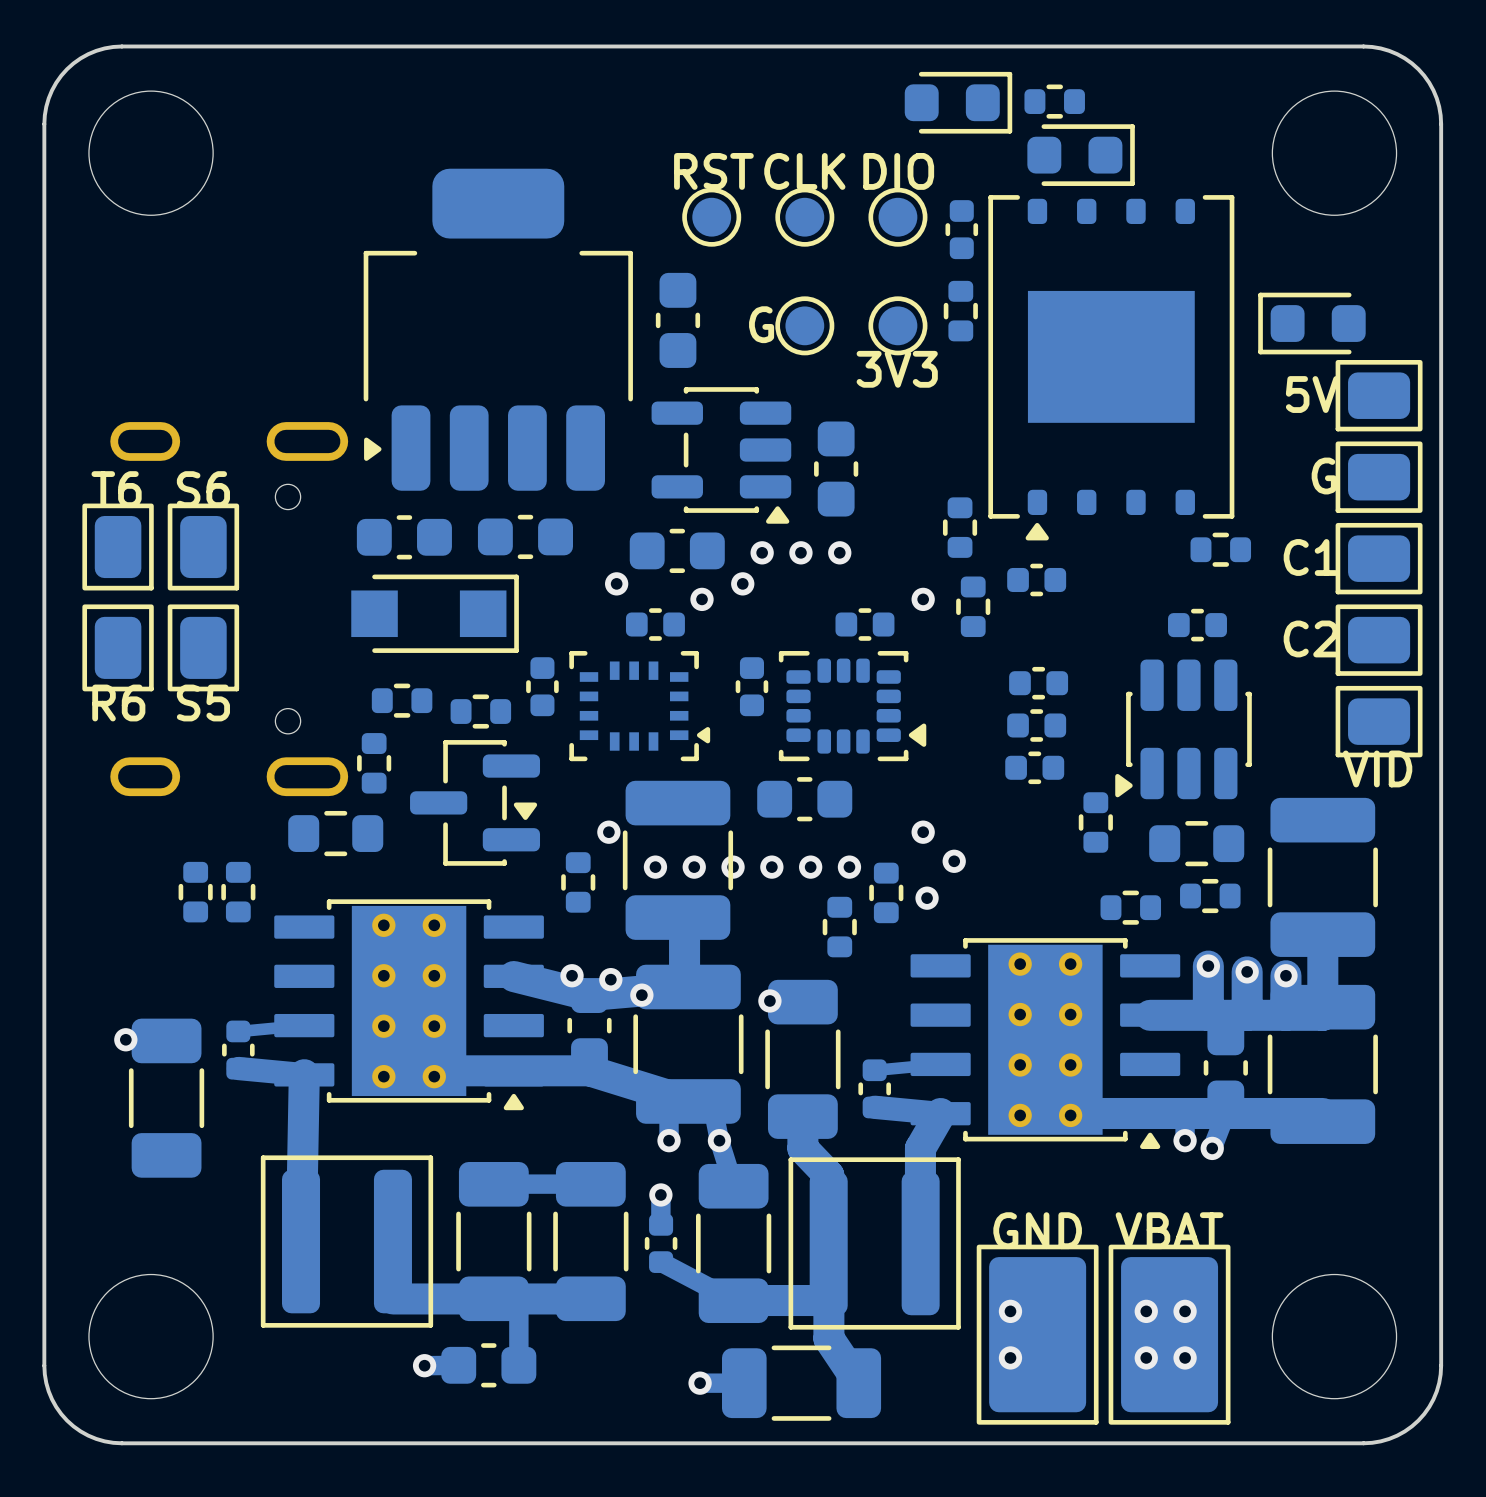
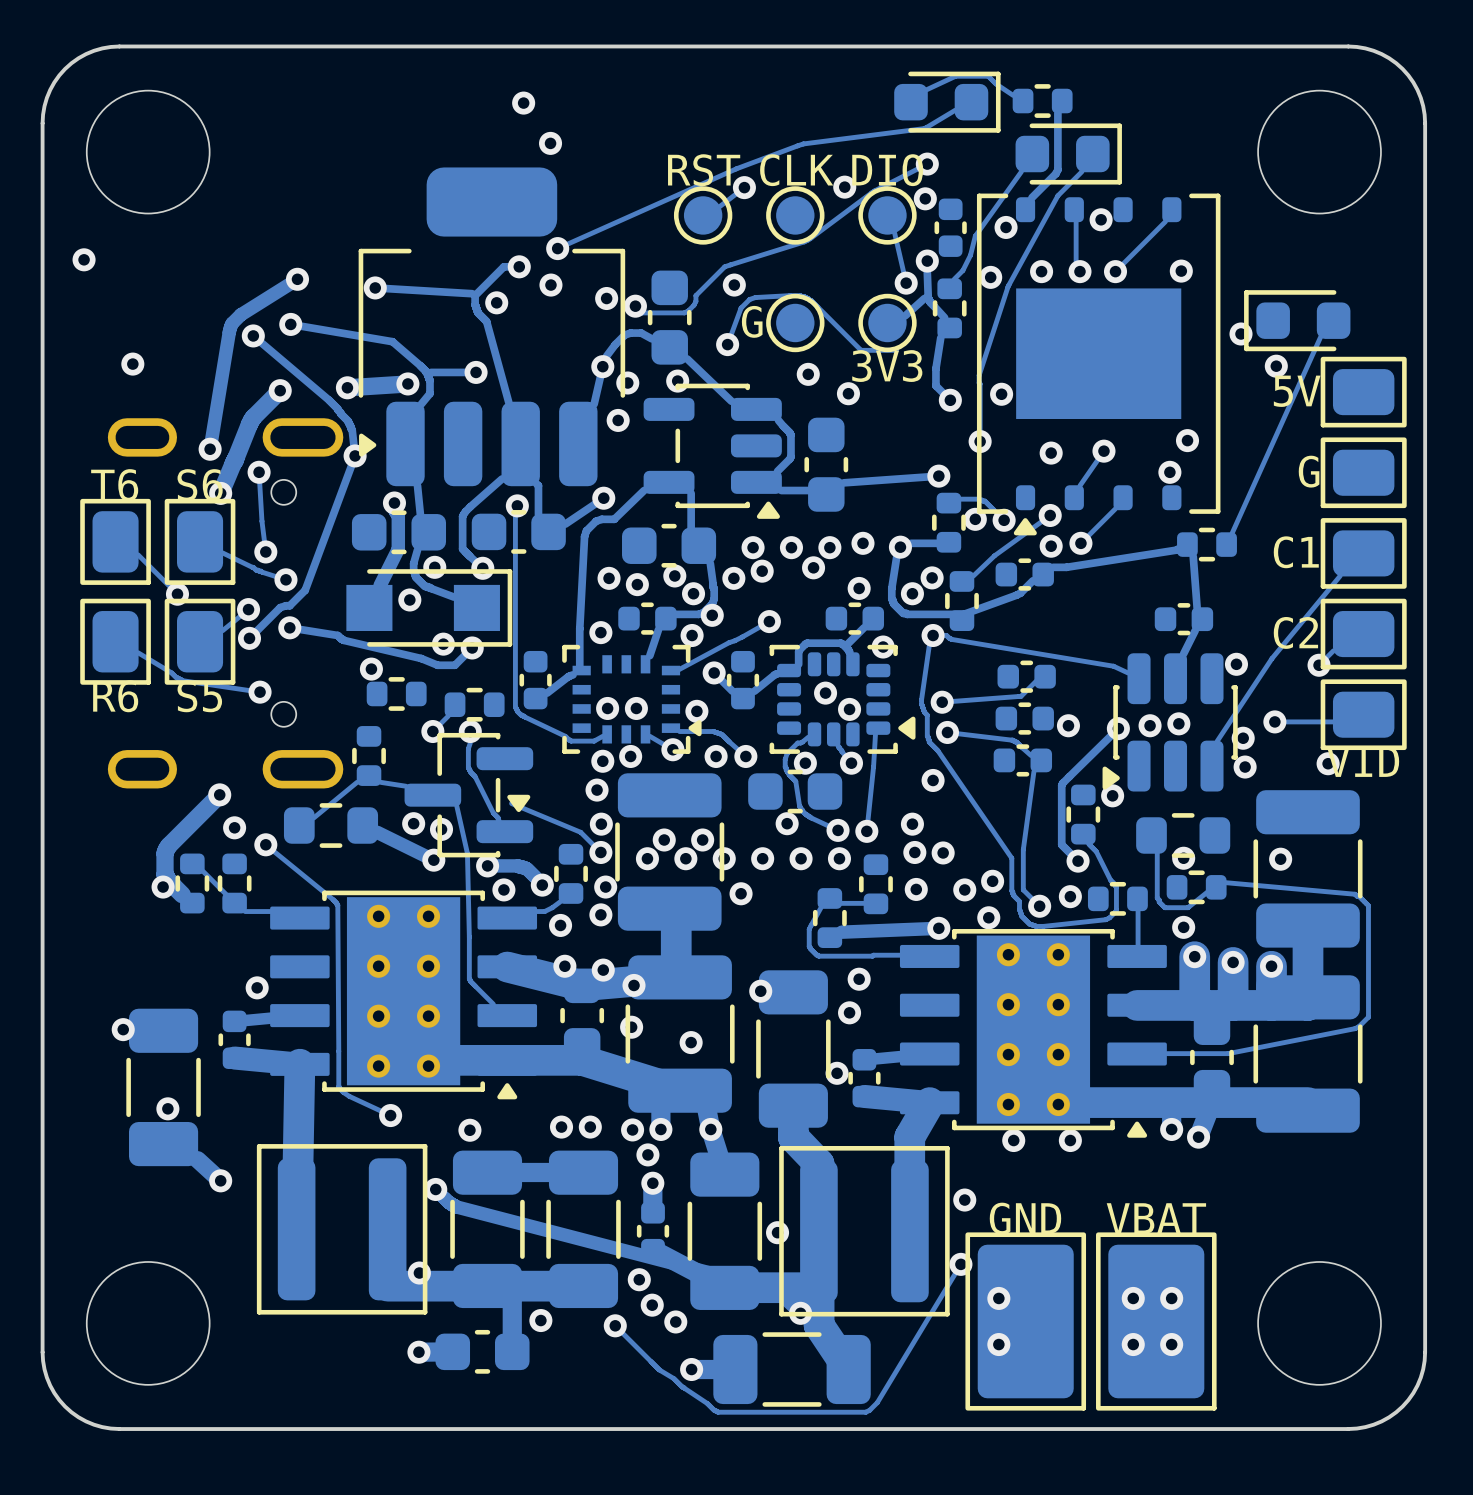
track: none -> (926, 89) (955, 76) (988, 76) (1013, 95)
via: none -> (523, 103)
track: none -> (955, 110) (924, 128) (797, 145) (736, 168) (557, 248)
track: none -> (1057, 113) (1057, 169) (1031, 197)
via: none -> (550, 143)
track: none -> (927, 164) (874, 190) (808, 239) (724, 266) (695, 295) (694, 305) (684, 312) (642, 312) (635, 306)
via: none -> (927, 164)
track: none -> (1021, 171) (975, 236) (970, 255) (962, 270) (954, 279)
track: none -> (1081, 171) (1057, 195) (1007, 286) (979, 375) (980, 441)
via: none -> (844, 187)
track: none -> (744, 187) (719, 206)
via: none -> (744, 187)
via: none -> (925, 198)
via: none -> (1101, 219)
track: none -> (1076, 221) (1076, 267) (1079, 271)
track: none -> (1165, 221) (1115, 271)
via: none -> (1006, 227)
track: none -> (894, 233) (906, 283)
via: none -> (557, 248)
via: none -> (84, 259)
via: none -> (927, 261)
track: none -> (519, 266) (503, 266) (475, 295) (477, 310) (486, 321) (508, 402)
via: none -> (519, 266)
via: none -> (1041, 271)
via: none -> (1079, 271)
via: none -> (1115, 271)
via: none -> (1181, 271)
track: none -> (927, 272) (928, 298) (944, 317)
via: none -> (990, 277)
track: none -> (297, 279) (240, 314) (232, 323) (210, 449)
via: none -> (297, 279)
via: none -> (906, 283)
via: none -> (550, 285)
via: none -> (734, 285)
track: none -> (375, 287) (472, 293)
via: none -> (375, 287)
via: none -> (606, 298)
track: none -> (924, 298) (905, 315)
via: none -> (496, 302)
via: none -> (635, 306)
track: none -> (290, 324) (392, 341) (428, 374) (429, 393) (421, 404)
via: none -> (290, 324)
via: none -> (1241, 334)
track: none -> (253, 335) (337, 408) (351, 427) (355, 455)
via: none -> (253, 335)
track: none -> (940, 337) (935, 368) (935, 385) (950, 400)
track: none -> (1320, 337) (1232, 533)
track: none -> (651, 338) (641, 333) (624, 334) (606, 356)
track: none -> (727, 344) (741, 308) (749, 299) (800, 295) (811, 300) (861, 350) (896, 350)
via: none -> (727, 344)
track: none -> (687, 358) (731, 401)
via: none -> (132, 364)
track: none -> (602, 366) (594, 404)
via: none -> (602, 366)
via: none -> (1276, 366)
track: none -> (476, 372) (430, 372)
via: none -> (476, 372)
via: none -> (808, 374)
via: none -> (677, 381)
via: none -> (627, 382)
track: none -> (407, 383) (347, 387)
via: none -> (407, 383)
via: none -> (347, 387)
track: none -> (280, 390) (251, 420) (220, 493)
via: none -> (280, 390)
via: none -> (848, 393)
via: none -> (1001, 394)
via: none -> (950, 400)
via: none -> (618, 420)
track: none -> (778, 420) (790, 434) (790, 456) (777, 471)
via: none -> (1187, 440)
via: none -> (980, 441)
via: none -> (210, 449)
track: none -> (1103, 451) (1079, 485)
via: none -> (1103, 451)
via: none -> (1051, 453)
via: none -> (355, 455)
track: none -> (351, 466) (305, 590) (289, 605) (280, 607) (249, 638)
track: none -> (259, 472) (265, 551)
via: none -> (259, 472)
via: none -> (1169, 472)
track: none -> (938, 476) (843, 482)
via: none -> (938, 476)
track: none -> (501, 479) (470, 506) (462, 516) (462, 549) (482, 568)
track: none -> (536, 483) (538, 485) (538, 514)
track: none -> (417, 485) (420, 514)
track: none -> (644, 490) (614, 519) (596, 521) (586, 530) (584, 536) (579, 628) (579, 666)
track: none -> (808, 490) (781, 490)
via: none -> (220, 493)
track: none -> (691, 493) (691, 527)
track: none -> (603, 498) (565, 524)
via: none -> (603, 498)
track: none -> (960, 499) (984, 501) (1004, 520)
track: none -> (394, 503) (394, 509) (398, 515) (398, 549) (380, 585)
via: none -> (394, 503)
via: none -> (517, 505)
track: none -> (1115, 508) (1080, 543)
track: none -> (1050, 515) (994, 555) (973, 575)
via: none -> (1050, 515)
track: none -> (515, 516) (515, 707) (521, 715) (565, 736) (571, 741) (594, 741) (602, 736)
via: none -> (975, 519)
via: none -> (1004, 520)
via: none -> (862, 543)
track: none -> (936, 543) (911, 543)
via: none -> (1080, 543)
via: none -> (1051, 546)
via: none -> (900, 547)
track: none -> (1177, 549) (1066, 567) (1053, 567)
track: none -> (417, 550) (413, 563) (415, 576) (425, 586) (453, 597)
via: none -> (265, 551)
track: none -> (222, 552) (256, 570) (285, 579)
track: none -> (138, 554) (177, 594)
track: none -> (1193, 556) (1197, 607)
track: none -> (896, 557) (891, 599) (903, 613) (907, 614) (963, 614) (1016, 595) (1032, 580)
track: none -> (710, 563) (714, 588) (712, 603) (698, 614) (675, 614)
via: none -> (434, 567)
via: none -> (482, 568)
via: none -> (813, 567)
via: none -> (762, 571)
via: none -> (674, 575)
track: none -> (1340, 575) (1271, 658) (1217, 741)
via: none -> (932, 577)
via: none -> (285, 579)
via: none -> (637, 584)
via: none -> (859, 588)
via: none -> (177, 594)
via: none -> (409, 599)
track: none -> (248, 609) (222, 630)
via: none -> (248, 609)
via: none -> (712, 615)
track: none -> (769, 621) (679, 669)
via: none -> (769, 621)
track: none -> (289, 627) (337, 635) (343, 640) (421, 658) (437, 665) (454, 665) (472, 647)
via: none -> (289, 627)
track: none -> (863, 627) (847, 644)
track: none -> (658, 629) (649, 655)
track: none -> (1195, 630) (1183, 653)
via: none -> (600, 632)
via: none -> (692, 635)
track: none -> (933, 635) (946, 635) (951, 639) (1113, 666) (1127, 672)
via: none -> (933, 635)
via: none -> (249, 638)
via: none -> (443, 644)
track: none -> (929, 646) (921, 699) (923, 710) (927, 715) (927, 736) (929, 742) (937, 750) (1011, 858) (1011, 890) (1019, 901) (1021, 915) (1030, 924) (1043, 926) (1105, 919) (1115, 912) (1116, 887) (1110, 880) (1096, 851) (1088, 843)
via: none -> (883, 647)
via: none -> (472, 647)
track: none -> (1333, 650) (1319, 665)
track: none -> (138, 652) (182, 680) (260, 692)
track: none -> (849, 652) (840, 643) (807, 643) (798, 651) (798, 664)
via: none -> (1236, 664)
via: none -> (1319, 665)
via: none -> (371, 669)
track: none -> (714, 672) (732, 691)
via: none -> (714, 672)
track: none -> (777, 673) (754, 691)
track: none -> (573, 674) (547, 693)
track: none -> (1036, 681) (1020, 696) (942, 702)
via: none -> (260, 692)
via: none -> (825, 693)
via: none -> (942, 702)
via: none -> (607, 708)
via: none -> (636, 708)
via: none -> (849, 709)
via: none -> (696, 711)
track: none -> (448, 716) (432, 731)
via: none -> (1274, 721)
track: none -> (1333, 721) (1274, 721)
via: none -> (1178, 723)
via: none -> (1068, 725)
via: none -> (1150, 725)
track: none -> (1118, 728) (1061, 785) (1061, 844) (1078, 861)
via: none -> (1118, 728)
via: none -> (432, 731)
via: none -> (470, 731)
track: none -> (679, 731) (714, 731) (719, 733) (745, 756)
track: none -> (947, 732) (1012, 740) (1031, 755)
via: none -> (947, 732)
track: none -> (875, 734) (866, 831)
track: none -> (649, 736) (672, 749)
track: none -> (808, 737) (797, 743) (787, 753) (785, 767) (795, 781) (799, 806) (802, 811) (809, 816) (838, 830)
via: none -> (1243, 738)
track: none -> (470, 743) (468, 767) (499, 820)
track: none -> (838, 745) (851, 763)
via: none -> (672, 749)
via: none -> (630, 756)
via: none -> (716, 756)
via: none -> (745, 756)
via: none -> (602, 761)
via: none -> (805, 763)
via: none -> (851, 763)
via: none -> (1328, 763)
via: none -> (1245, 767)
track: none -> (1033, 771) (1023, 849) (1023, 889) (1039, 906)
via: none -> (933, 780)
track: none -> (357, 782) (313, 817)
track: none -> (381, 782) (405, 786)
via: none -> (597, 790)
track: none -> (219, 794) (165, 850) (165, 877) (182, 894)
via: none -> (219, 794)
via: none -> (1112, 795)
track: none -> (511, 803) (580, 832) (600, 852)
track: none -> (456, 806) (467, 853) (469, 979) (493, 1004)
via: none -> (413, 823)
via: none -> (787, 823)
via: none -> (234, 827)
via: none -> (441, 829)
via: none -> (838, 830)
via: none -> (866, 831)
track: none -> (377, 832) (433, 860)
via: none -> (664, 840)
via: none -> (702, 840)
track: none -> (265, 844) (337, 905) (338, 1086) (349, 1096) (390, 1115)
via: none -> (265, 844)
via: none -> (600, 852)
via: none -> (914, 852)
track: none -> (1157, 852) (1157, 898) (1164, 907) (1187, 907) (1207, 892)
via: none -> (1183, 858)
via: none -> (1280, 859)
via: none -> (433, 860)
via: none -> (1078, 861)
track: none -> (487, 865) (518, 865) (525, 867) (542, 885)
via: none -> (487, 865)
track: none -> (202, 871) (225, 894)
via: none -> (992, 881)
track: none -> (1226, 882) (1355, 894) (1358, 896) (1368, 905) (1368, 1017) (1355, 1028) (1228, 1053) (1166, 1053)
via: none -> (542, 885)
via: none -> (163, 887)
via: none -> (605, 887)
via: none -> (503, 889)
via: none -> (964, 889)
via: none -> (741, 893)
via: none -> (1070, 896)
track: none -> (560, 901) (544, 911) (537, 911)
track: none -> (863, 903) (841, 903)
via: none -> (1039, 906)
track: none -> (820, 908) (809, 929) (809, 946) (816, 955) (900, 955)
track: none -> (1138, 909) (1138, 946)
track: none -> (272, 911) (245, 911)
via: none -> (600, 914)
via: none -> (988, 917)
via: none -> (560, 925)
via: none -> (1183, 927)
track: none -> (938, 928) (841, 932)
via: none -> (938, 928)
via: none -> (859, 979)
via: none -> (257, 987)
via: none -> (849, 1012)
via: none -> (631, 1027)
via: none -> (691, 1042)
via: none -> (837, 1073)
via: none -> (167, 1108)
via: none -> (390, 1115)
via: none -> (561, 1127)
via: none -> (590, 1127)
via: none -> (469, 1130)
via: none -> (632, 1129)
via: none -> (1013, 1140)
via: none -> (1070, 1140)
via: none -> (647, 1154)
track: none -> (197, 1159) (220, 1180)
via: none -> (220, 1180)
track: none -> (435, 1189) (455, 1206) (776, 1290) (800, 1313)
via: none -> (435, 1189)
via: none -> (964, 1200)
via: none -> (777, 1232)
track: none -> (960, 1264) (877, 1402) (865, 1412) (718, 1412) (659, 1369) (615, 1325)
via: none -> (960, 1264)
via: none -> (419, 1273)
via: none -> (639, 1279)
via: none -> (652, 1305)
via: none -> (800, 1313)
via: none -> (540, 1320)
via: none -> (675, 1321)
via: none -> (615, 1325)

